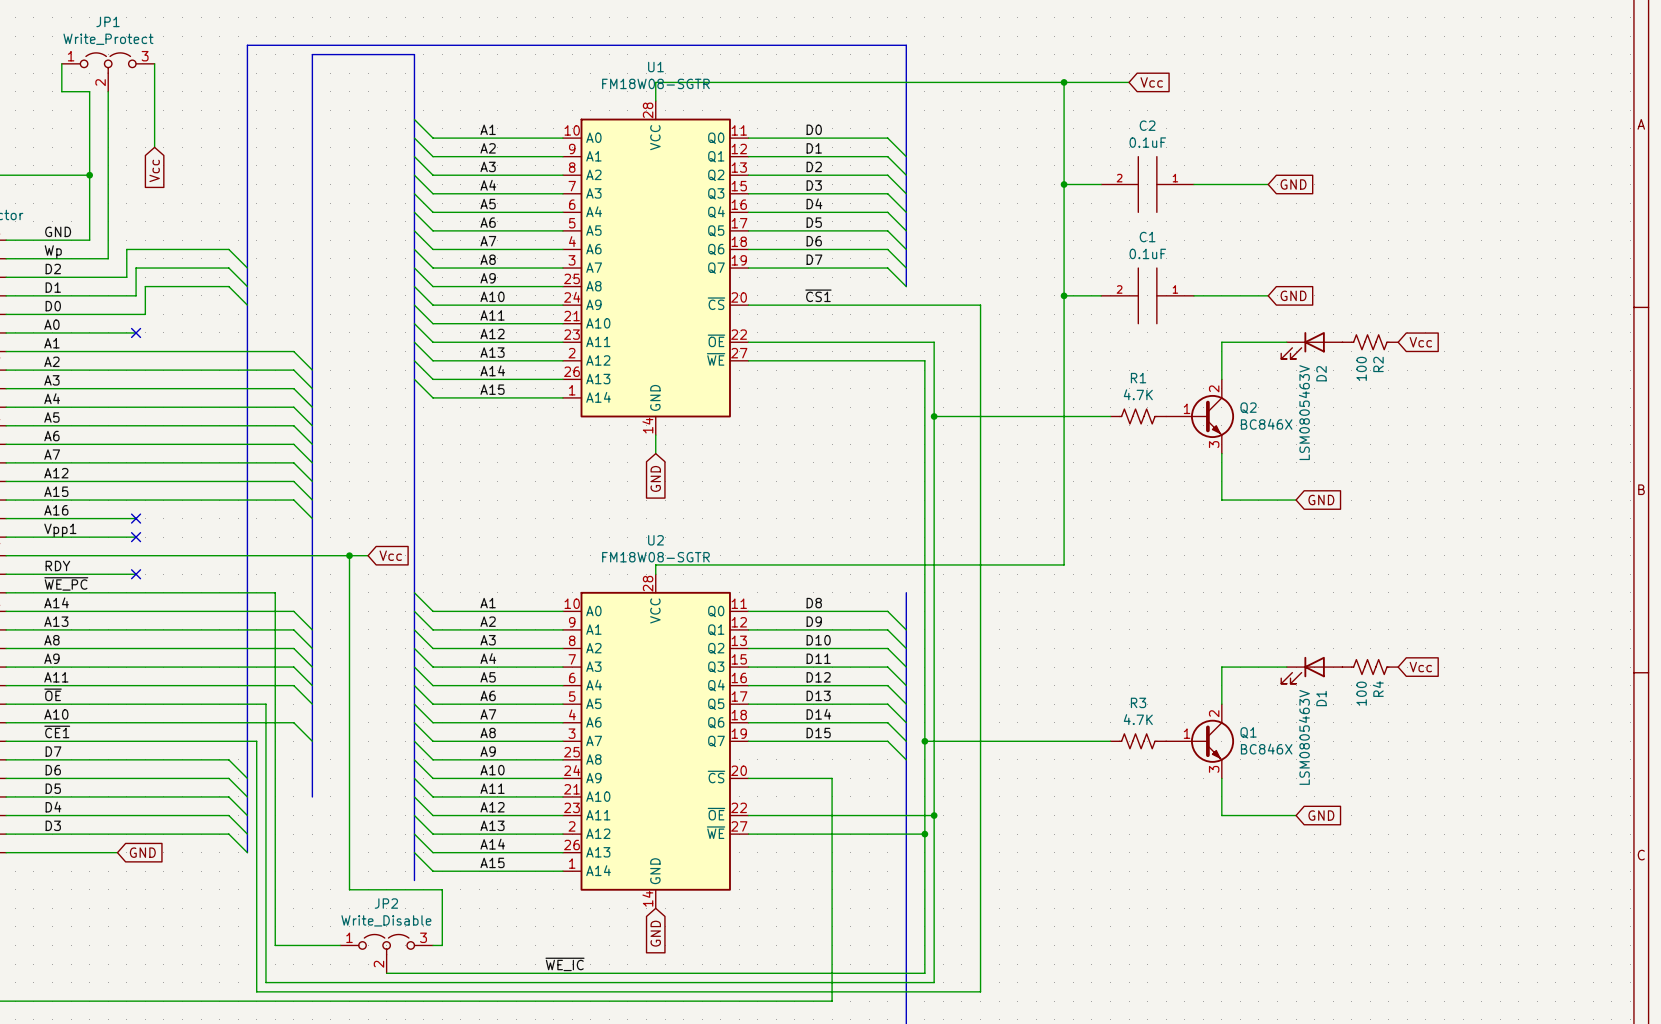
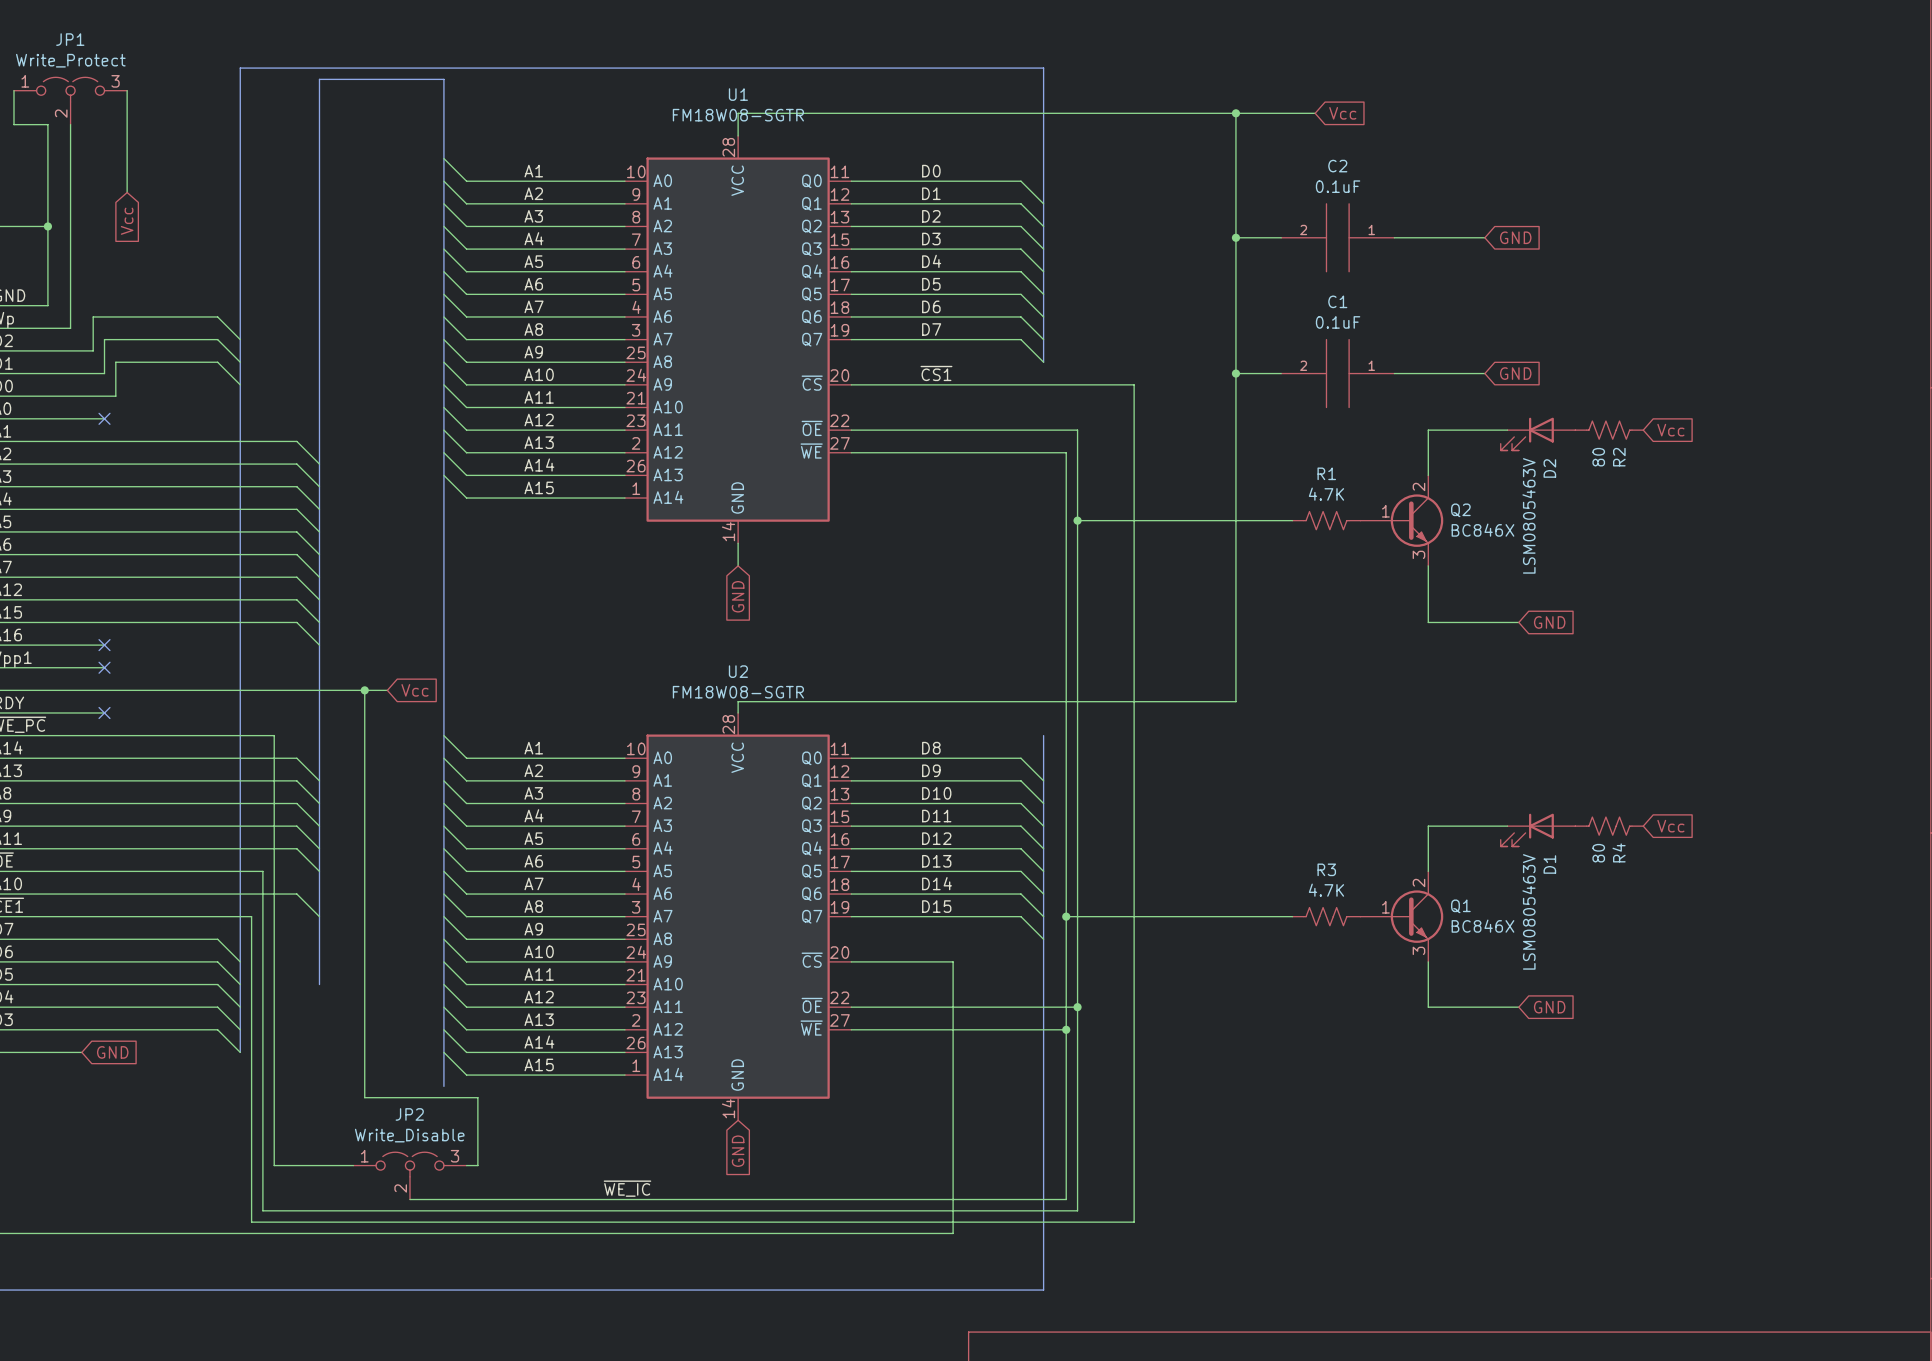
R2 value: 100 (1361, 368) -> 80 (1598, 457)
R4 value: 100 (1361, 693) -> 80 (1598, 853)

